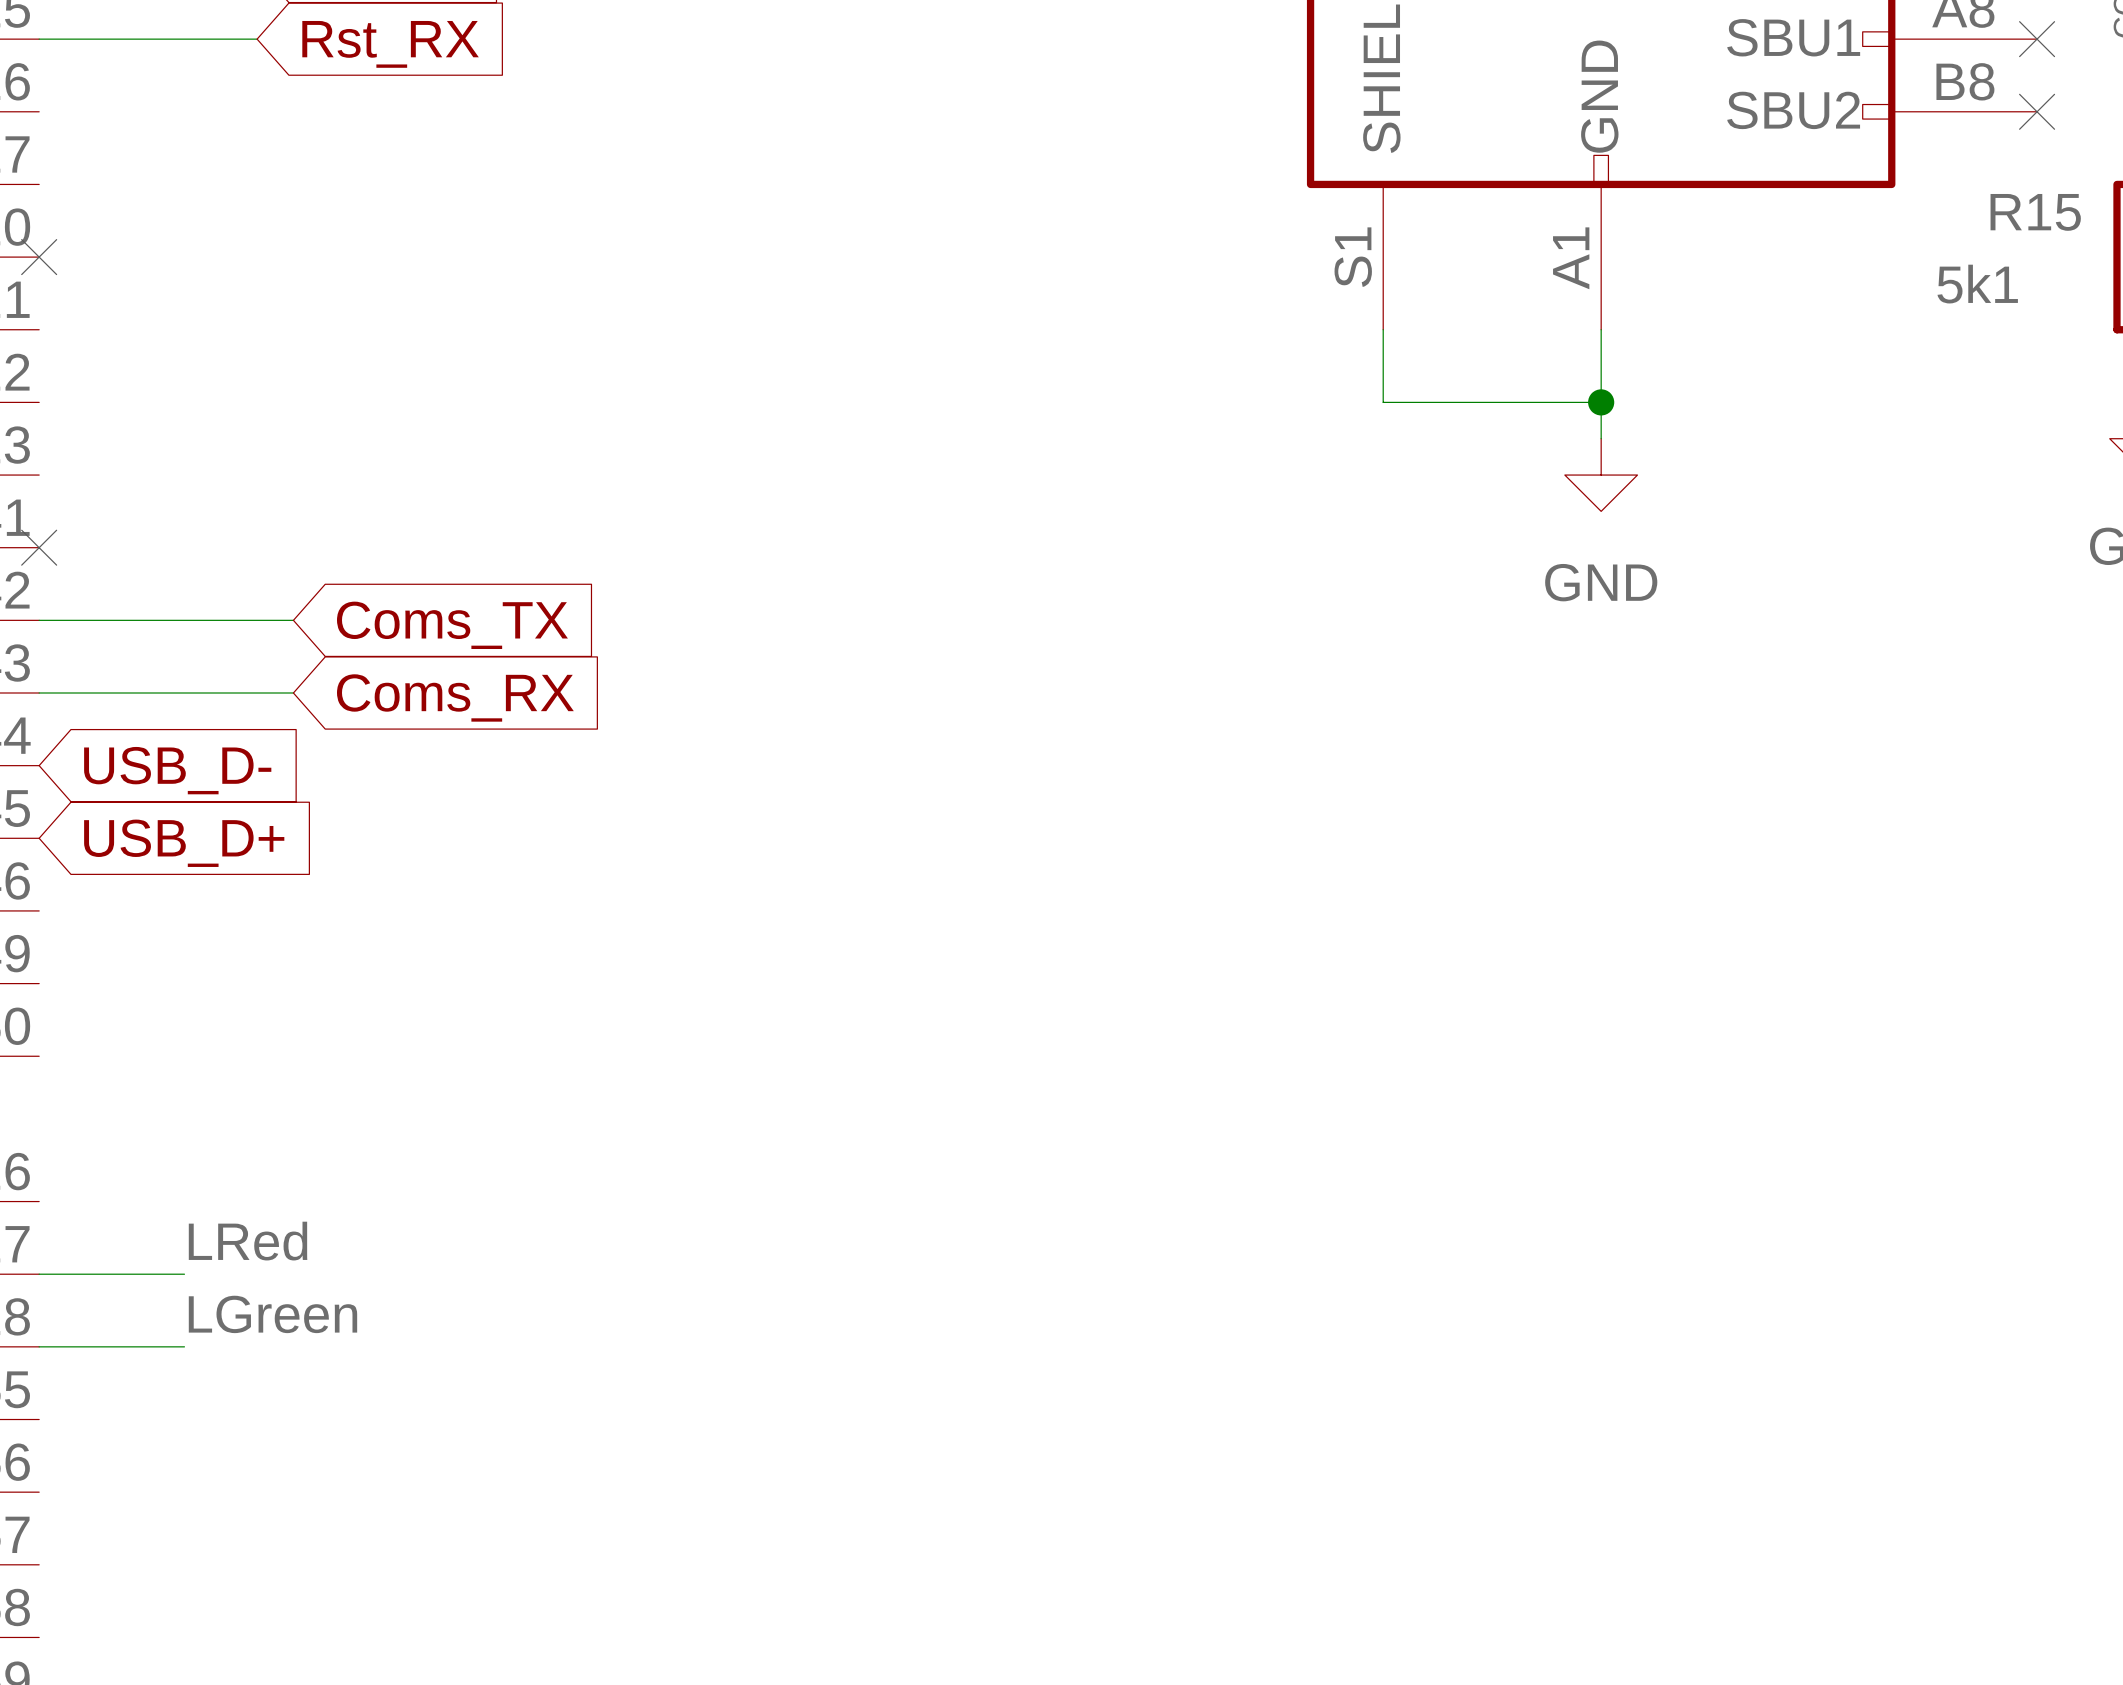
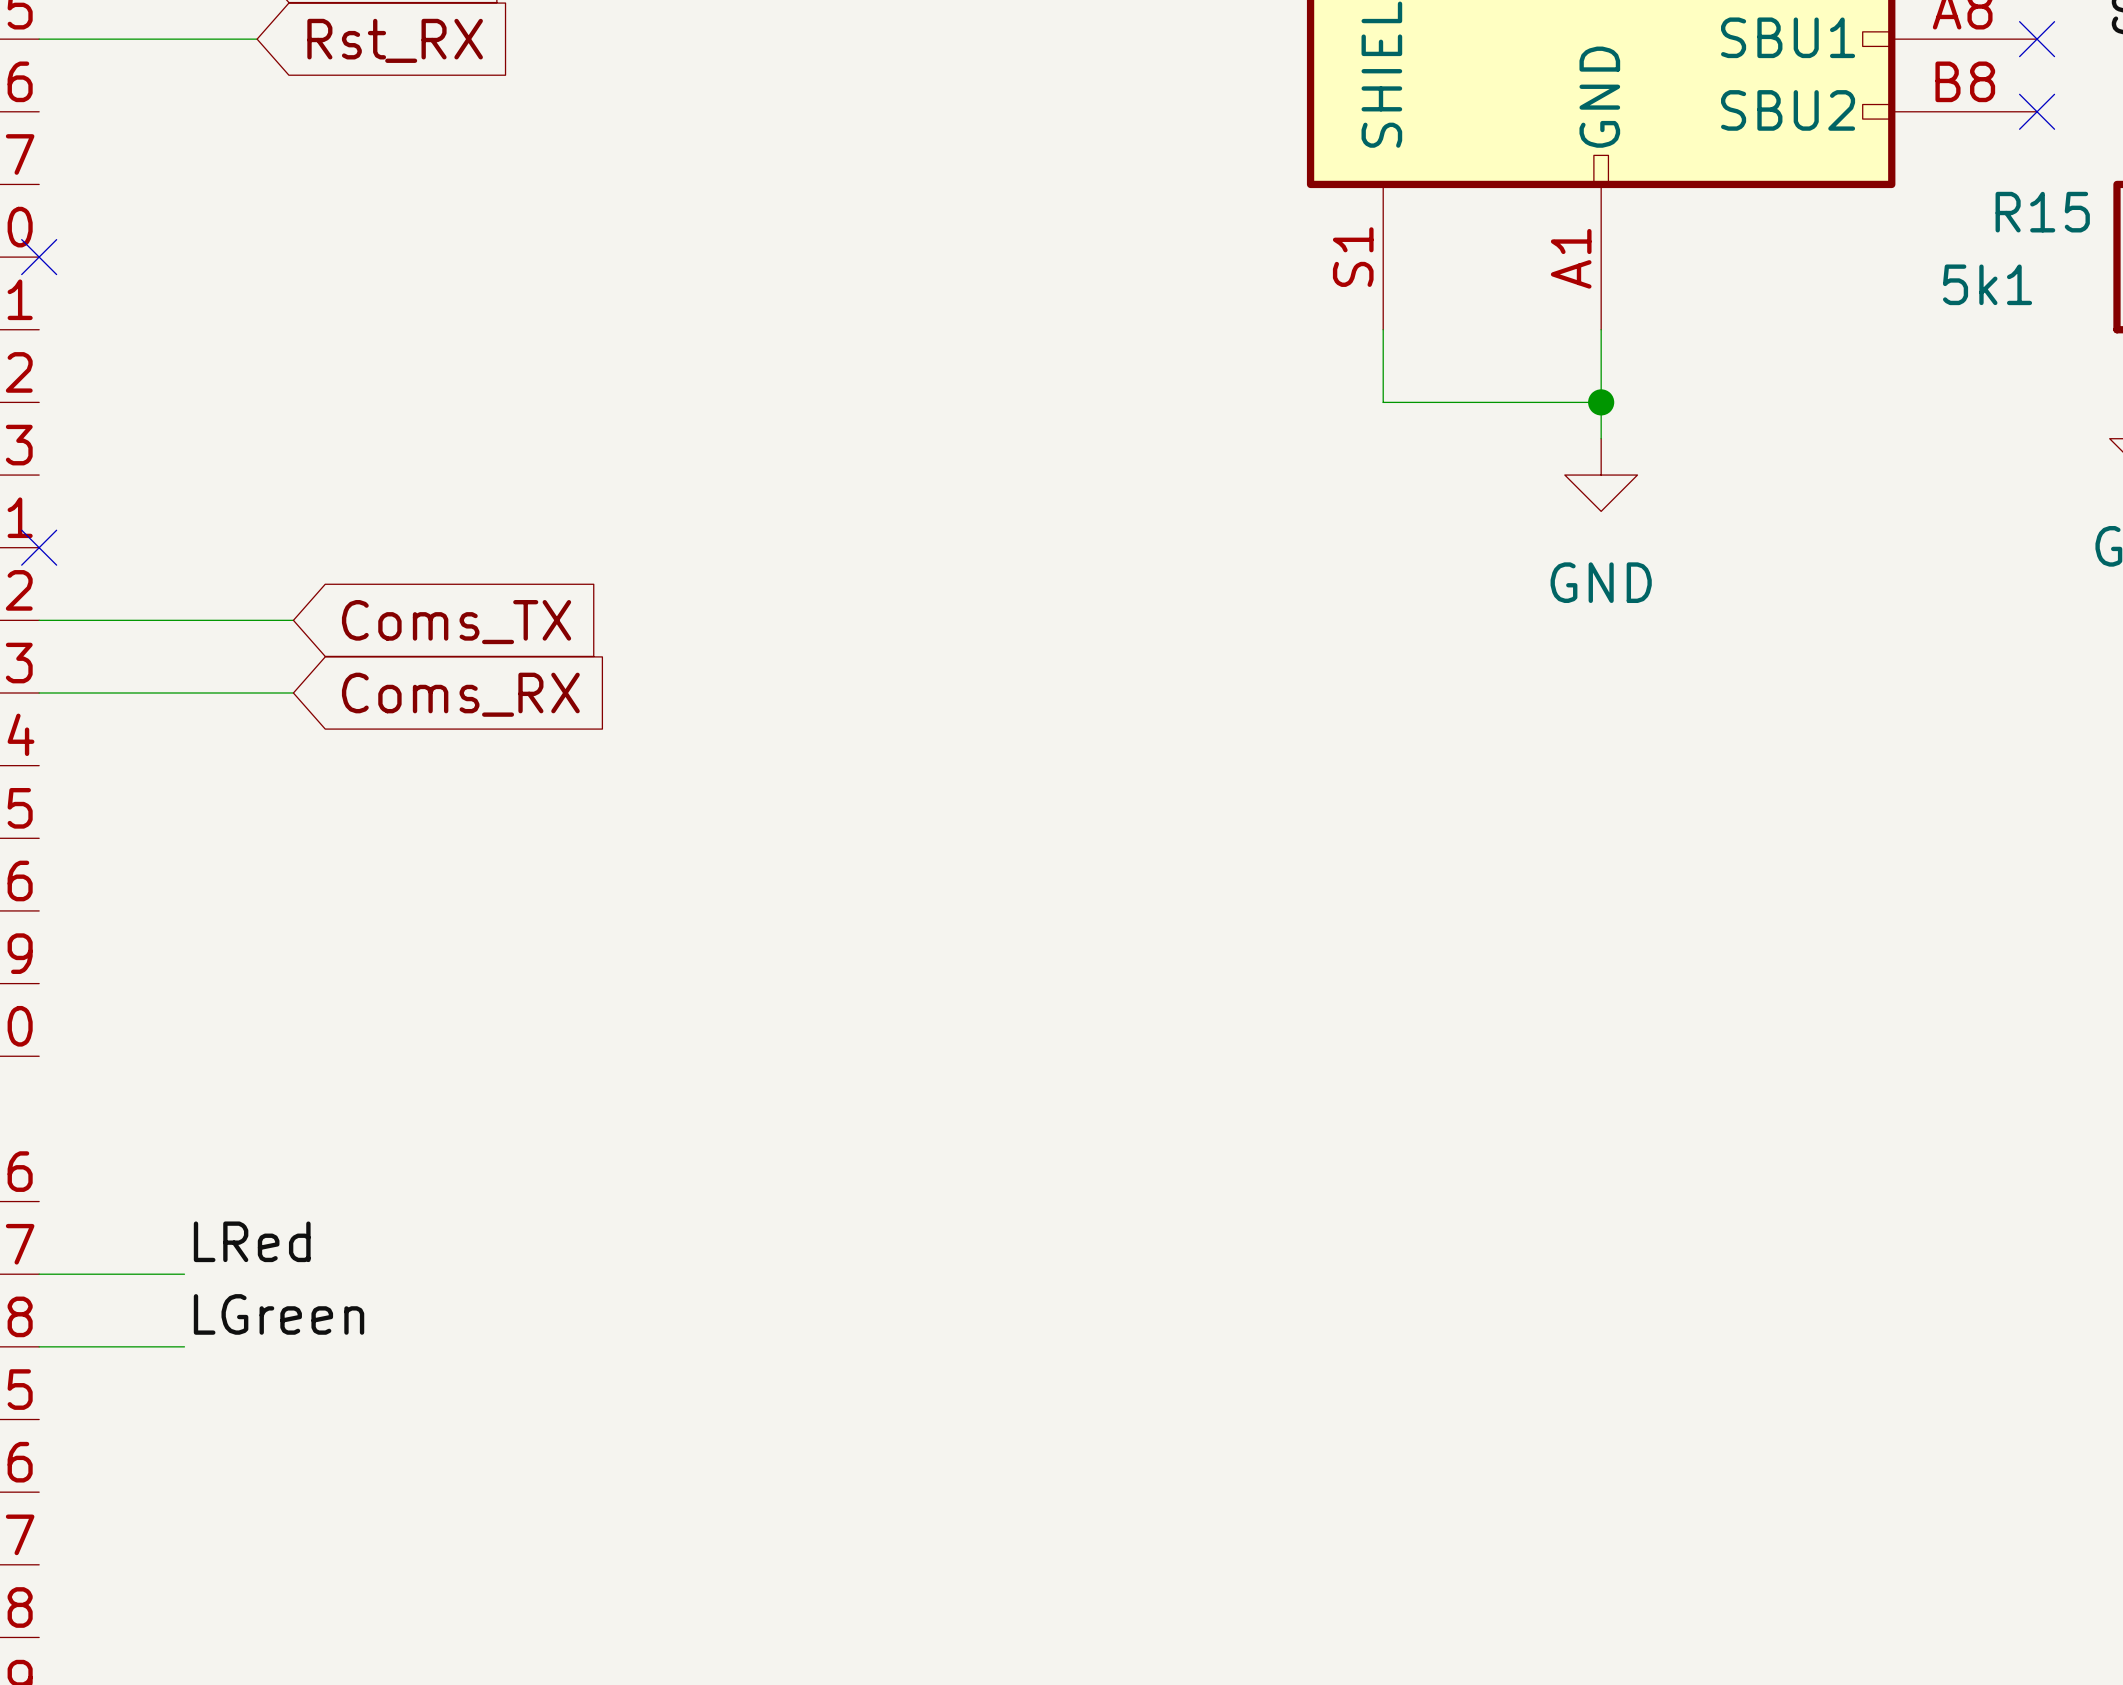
global label: USB_D- (177, 770) -> none
global label: USB_D+ (184, 843) -> none

